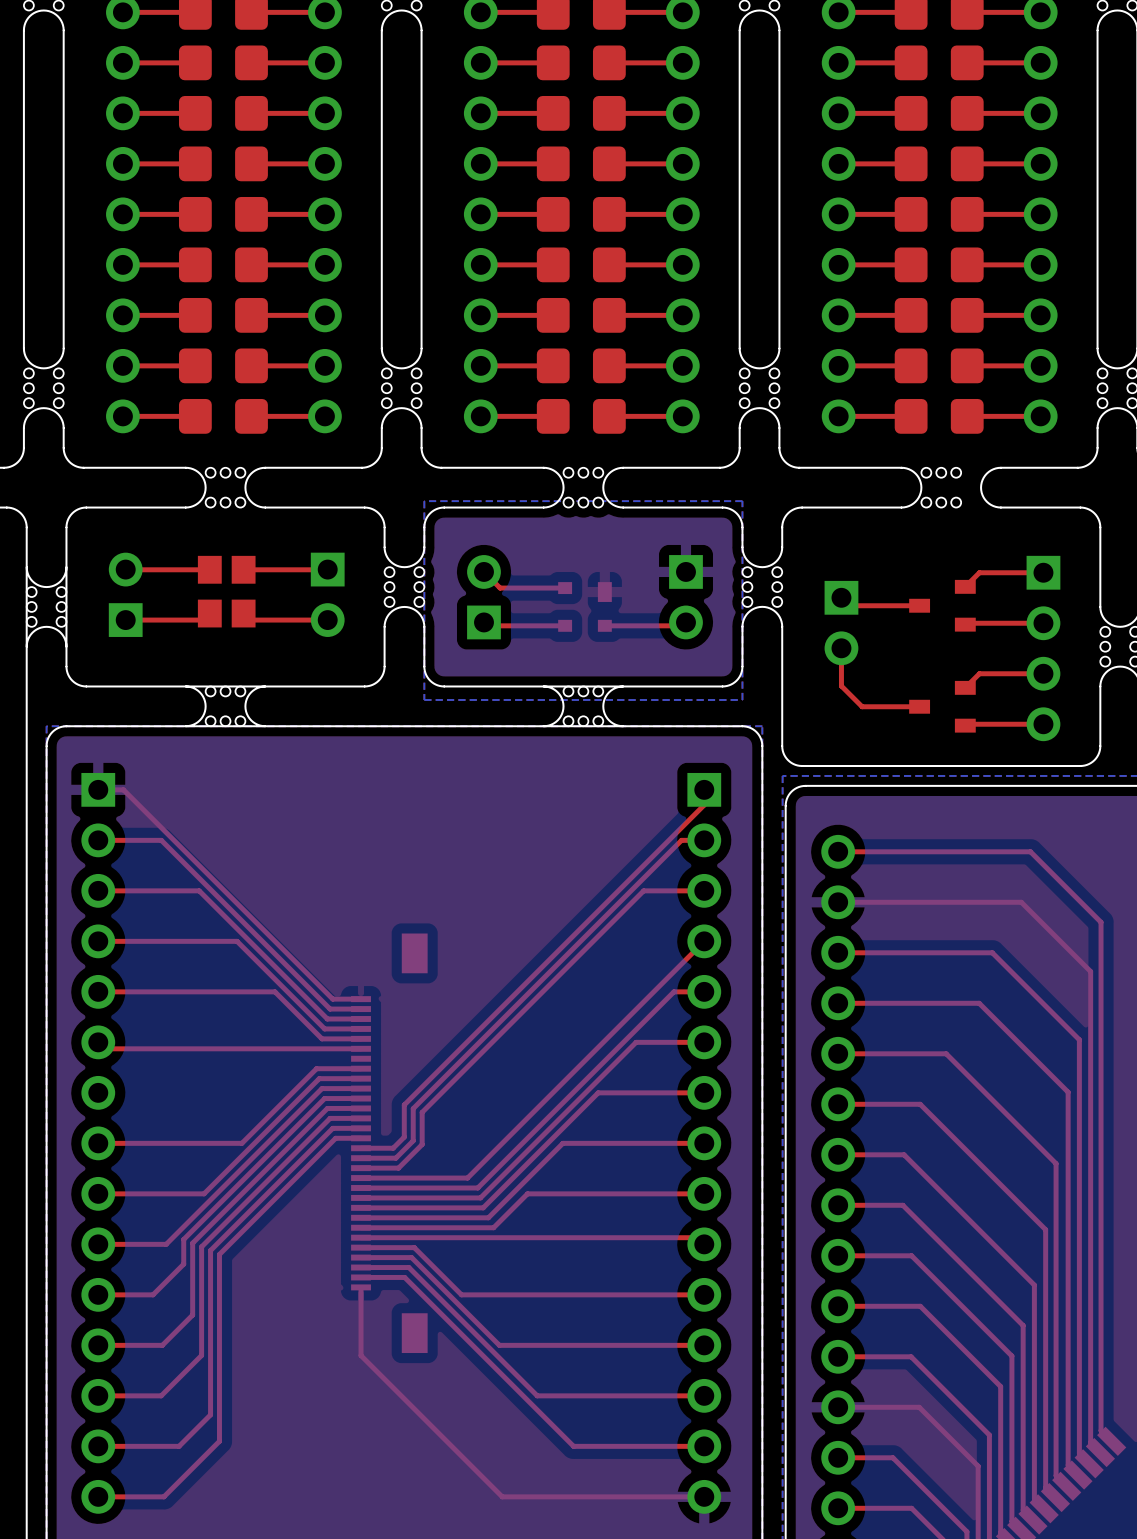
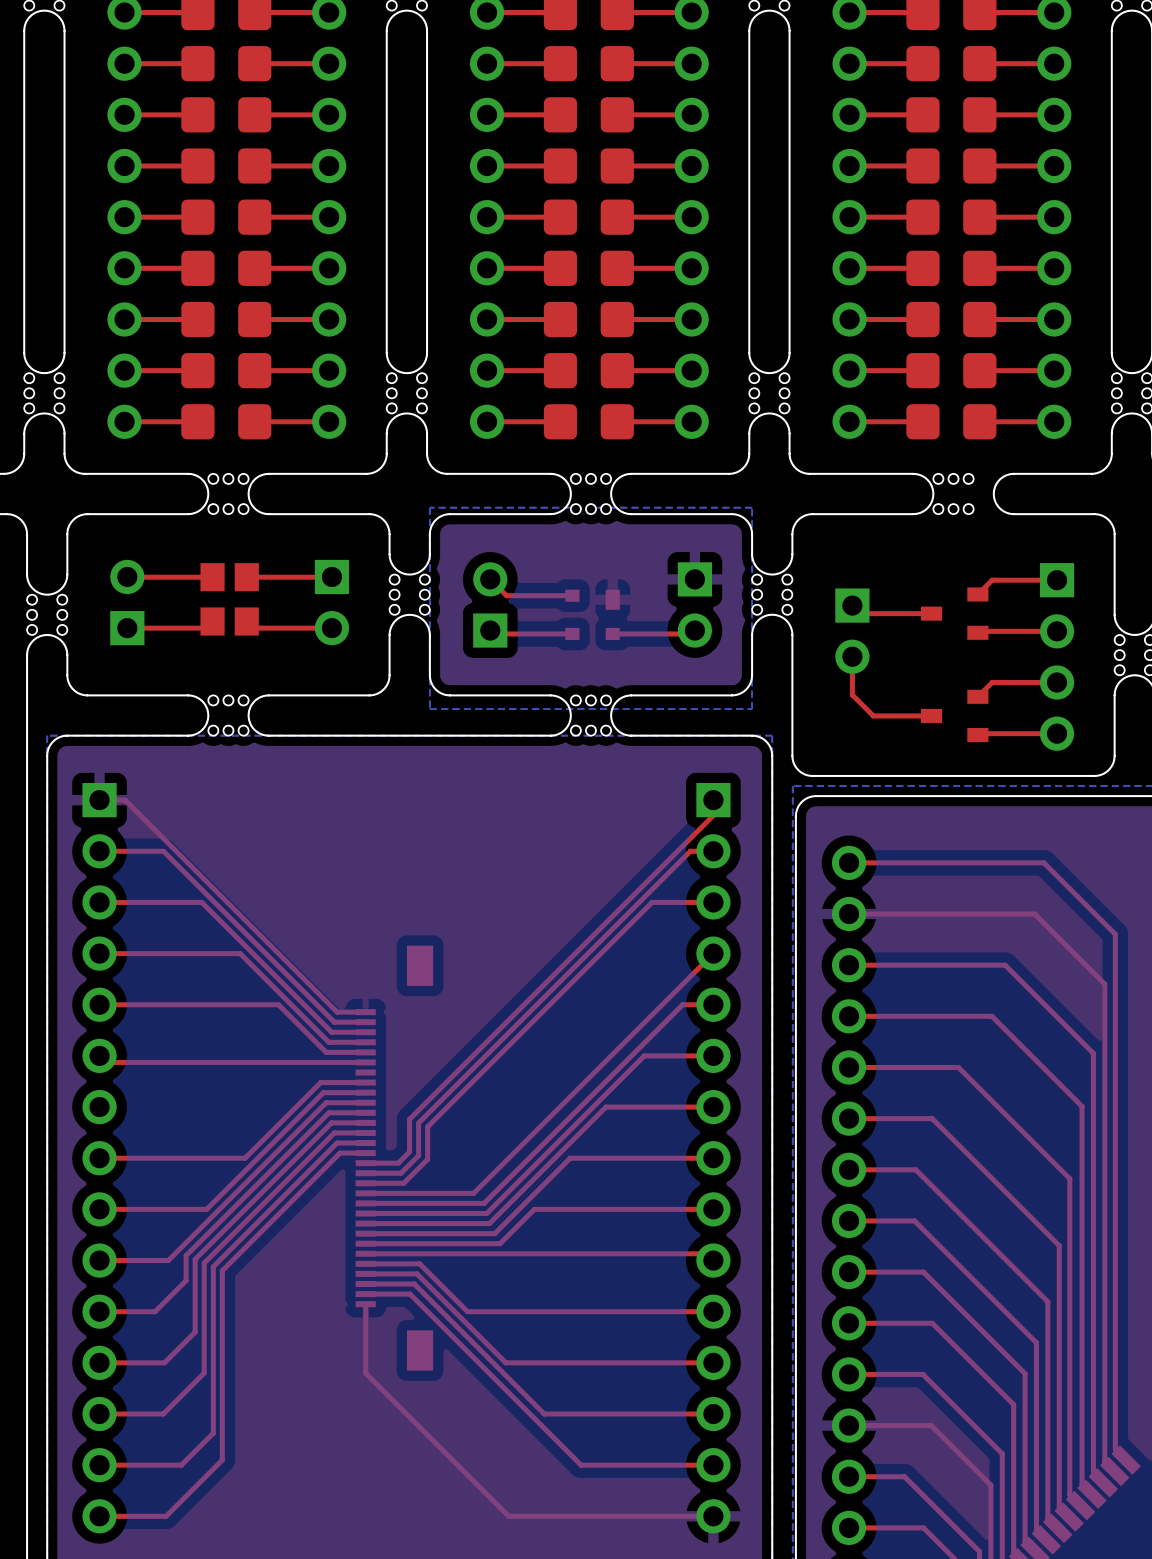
board edge: (26, 567) (26, 646) -> none
board edge: (66, 567) (66, 646) -> none
board edge: (265, 686) (185, 686) -> none
board edge: (623, 686) (543, 686) -> none
board edge: (265, 726) (185, 726) -> none
board edge: (623, 726) (543, 726) -> none

